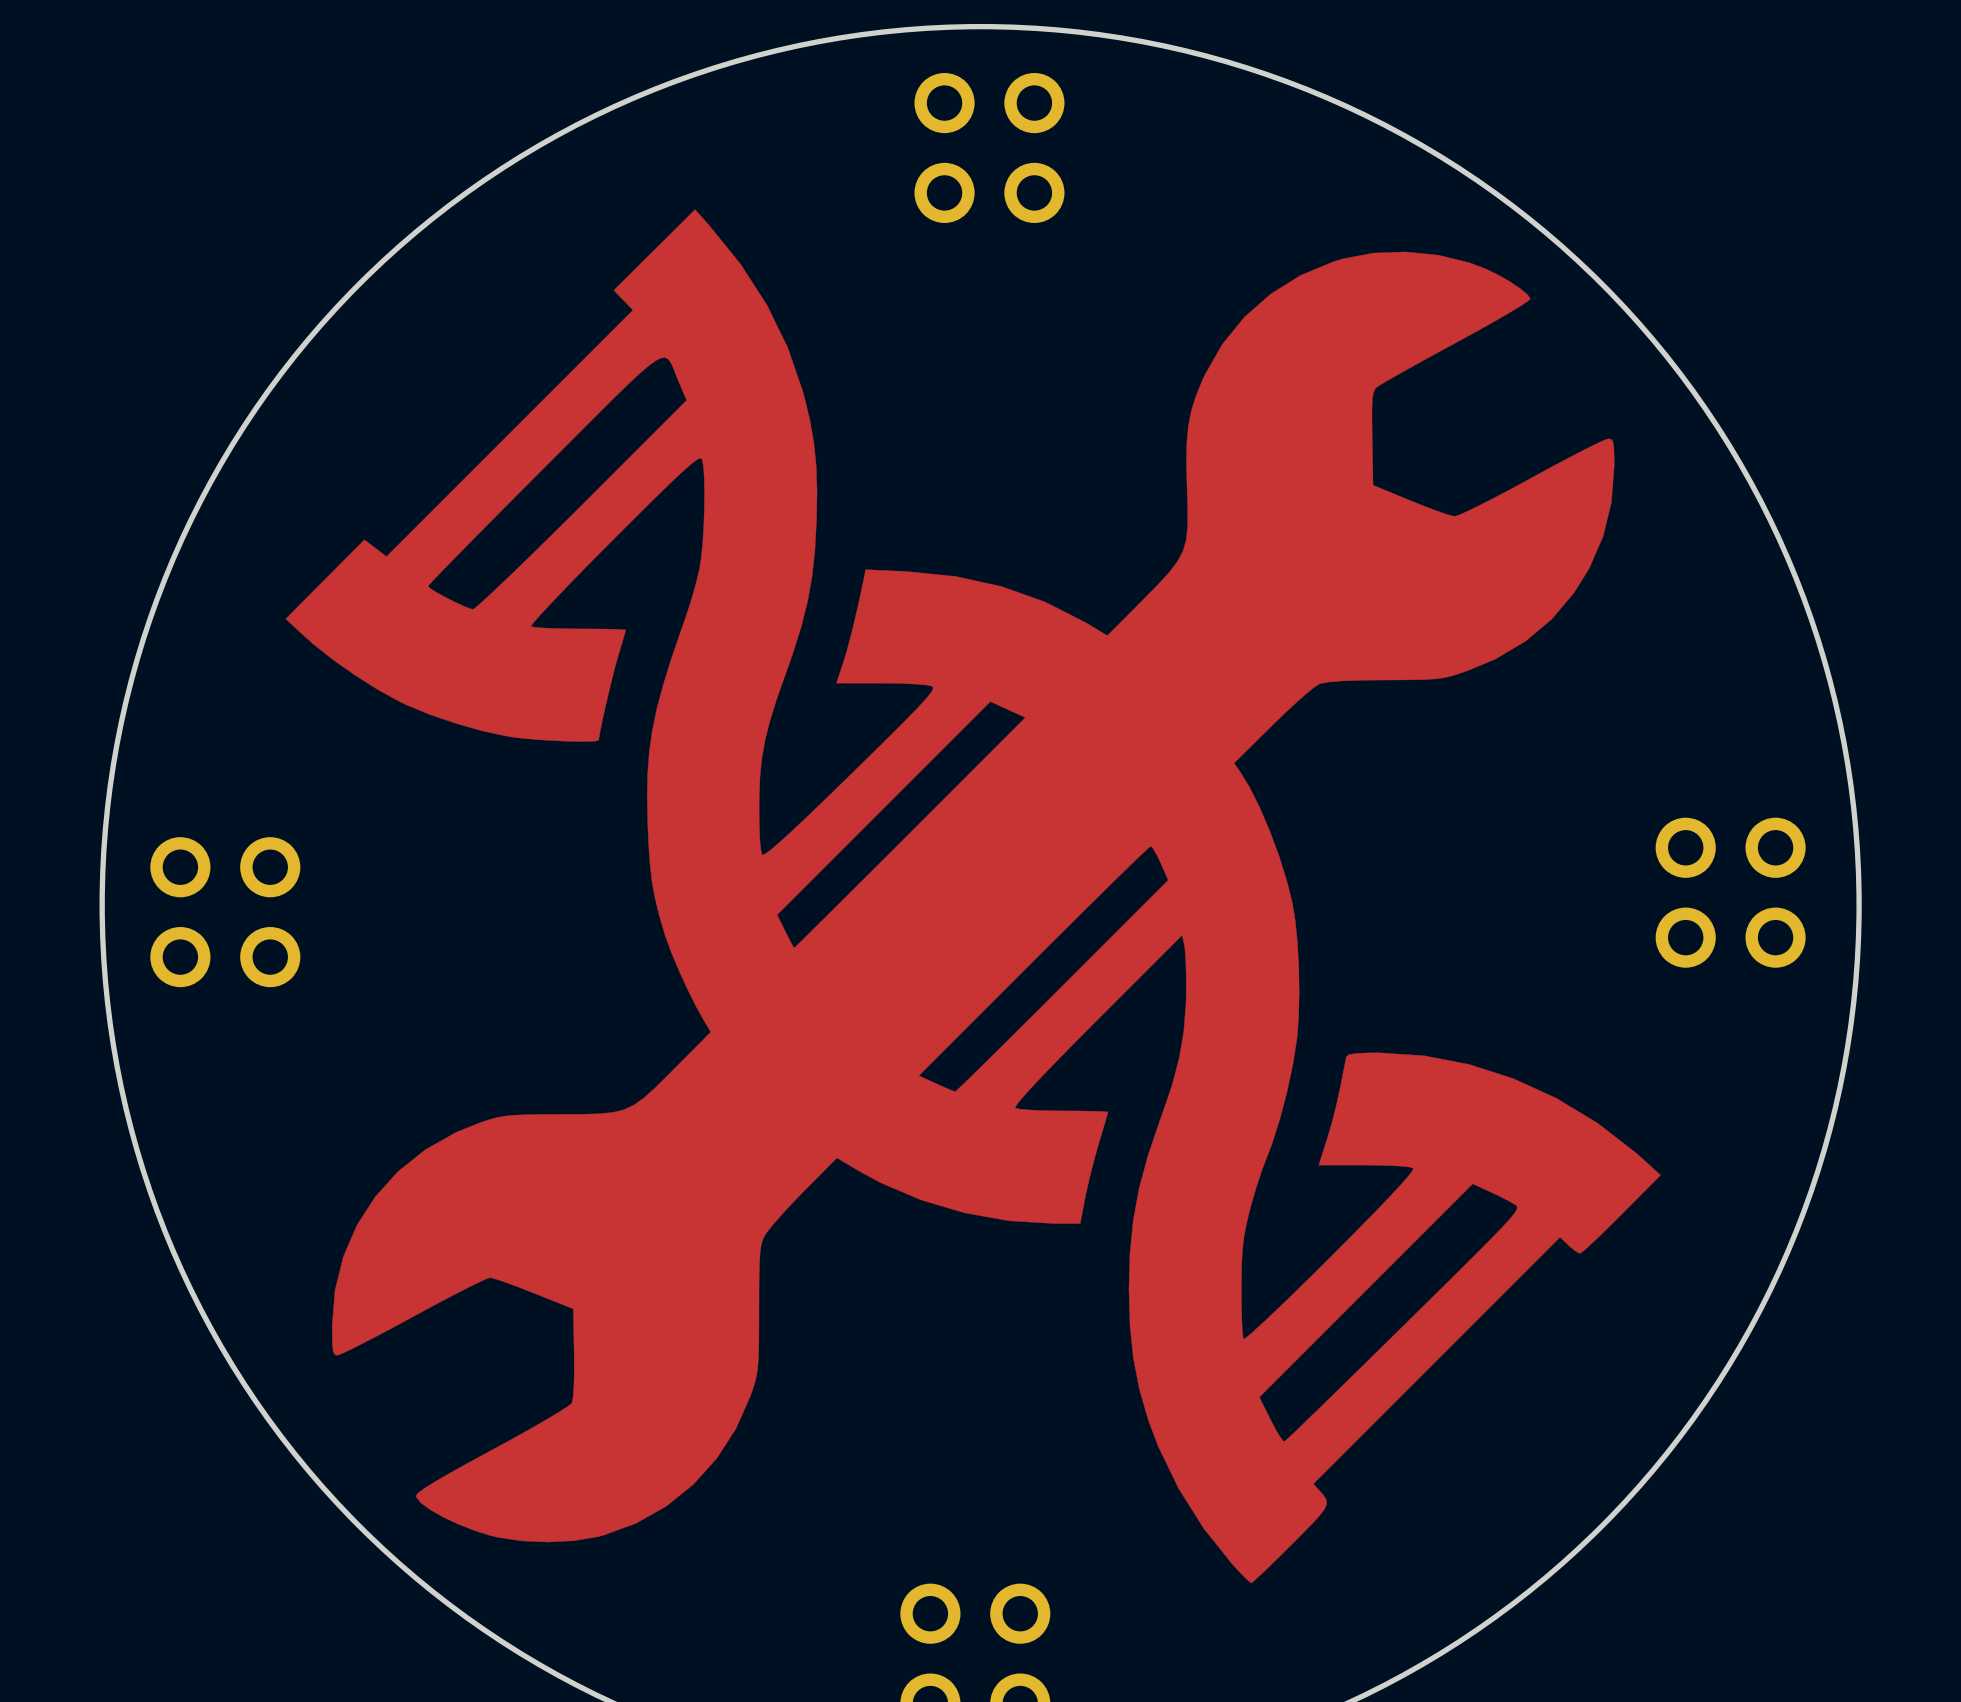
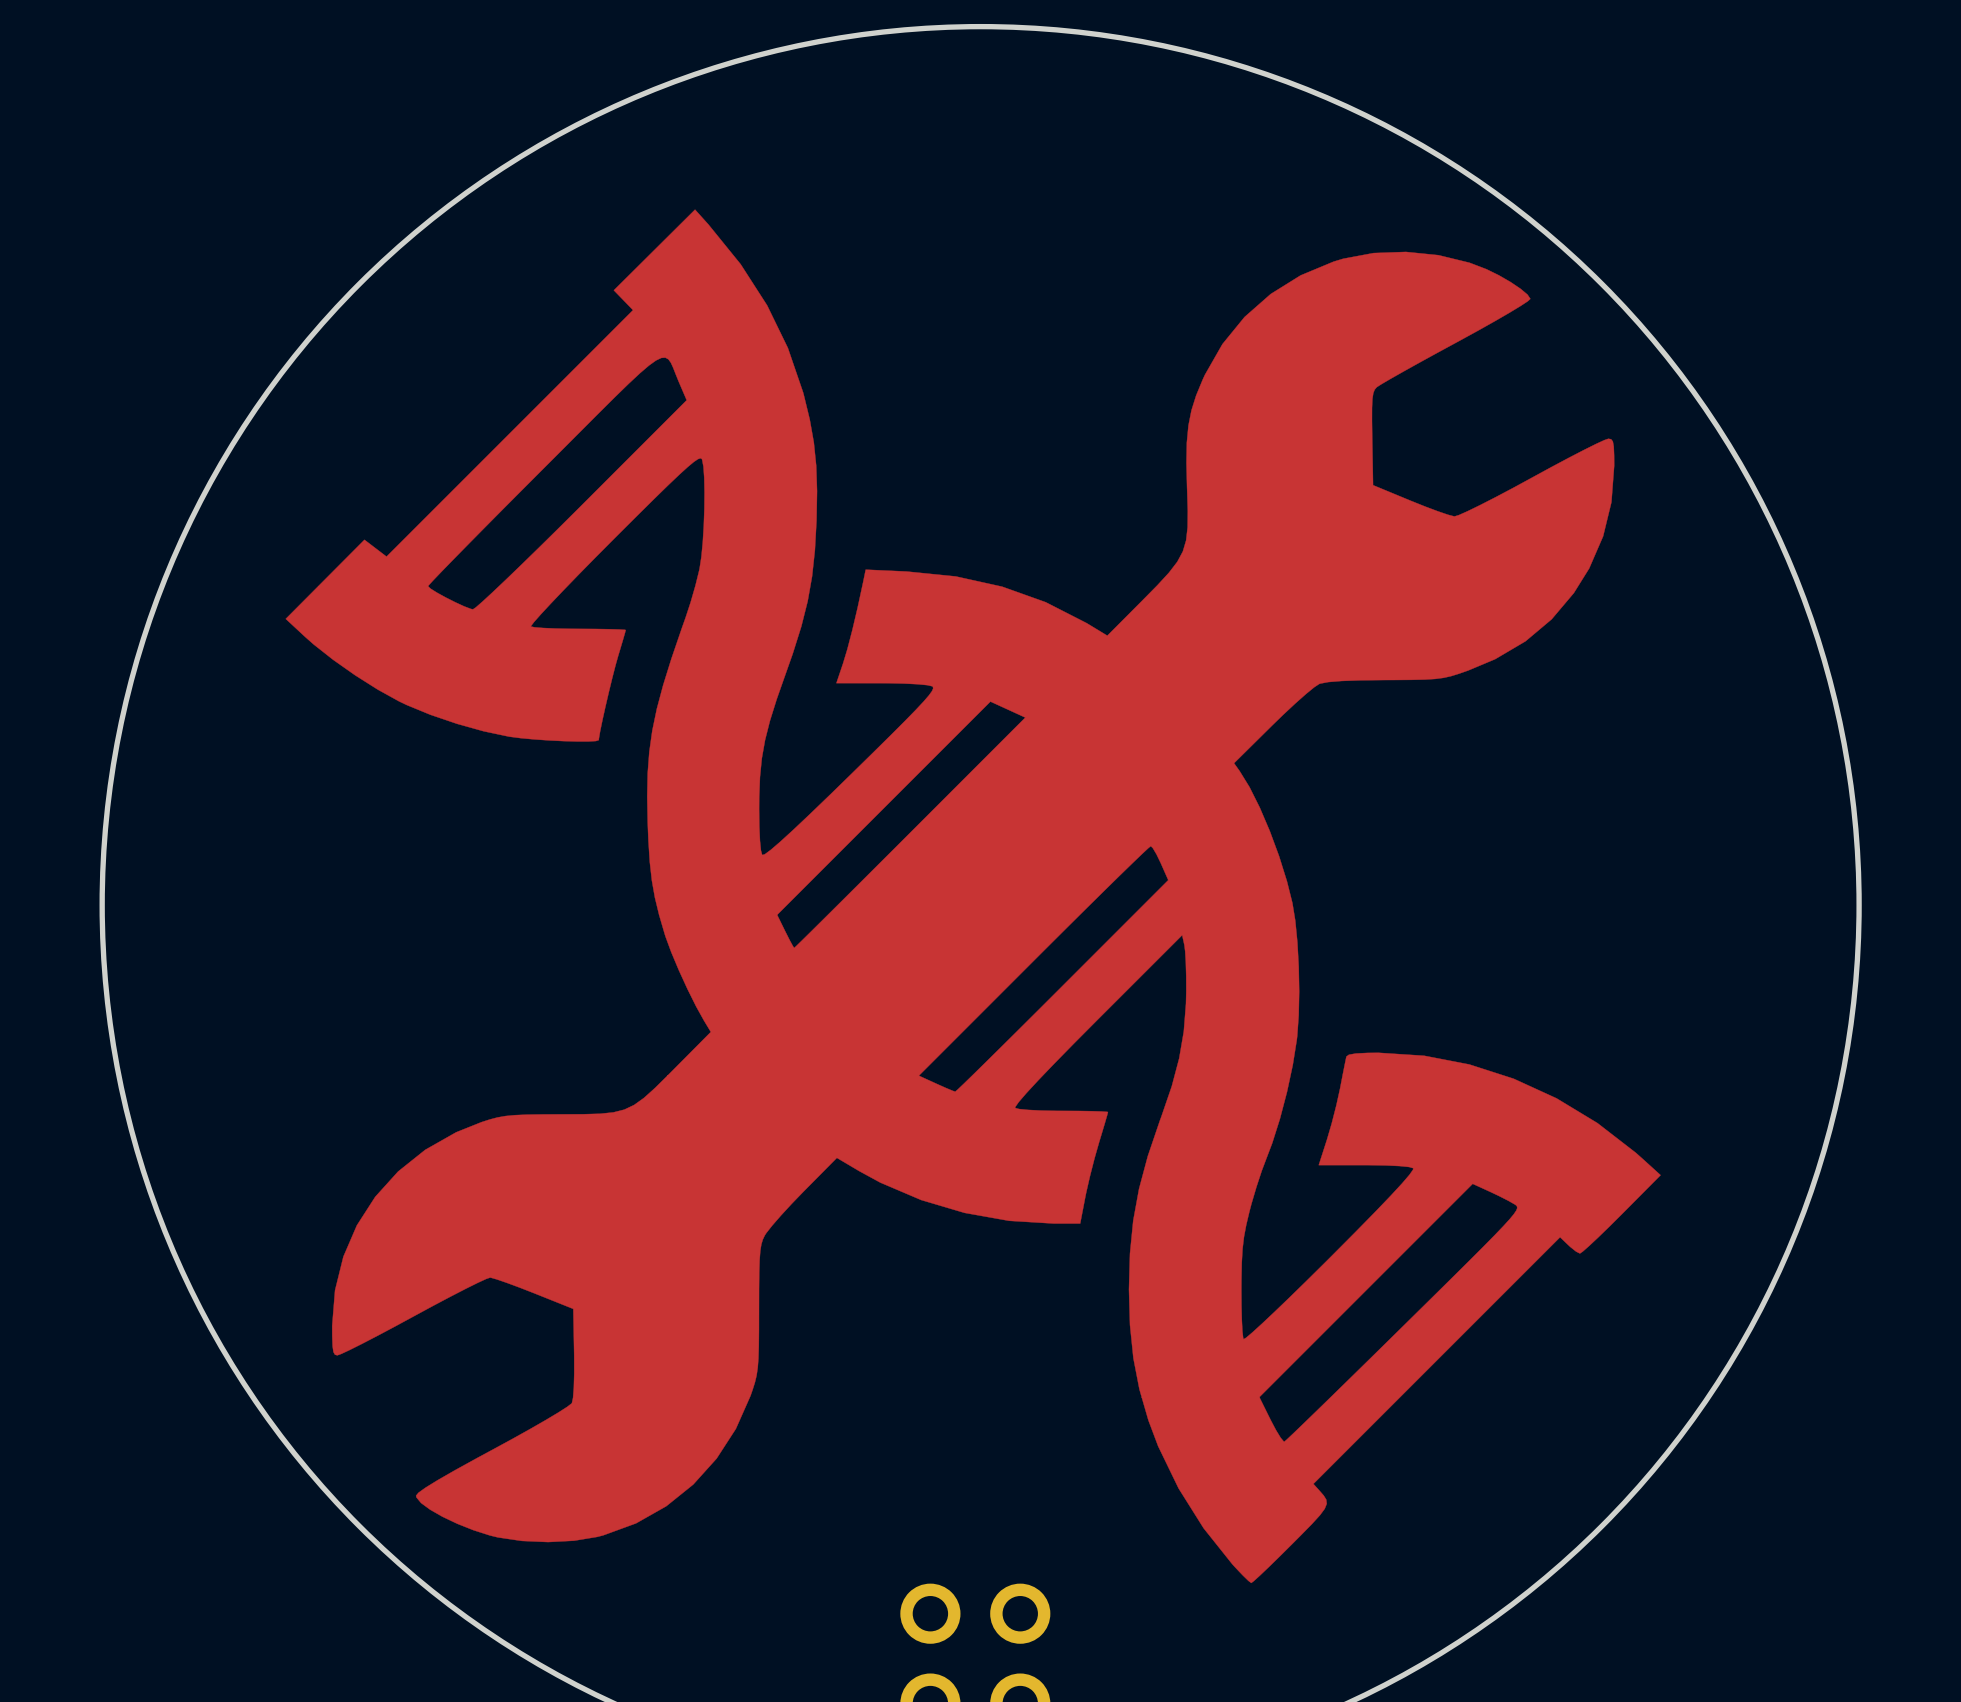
part: (989, 148) -> none
part: (1730, 892) -> none
part: (225, 912) -> none

